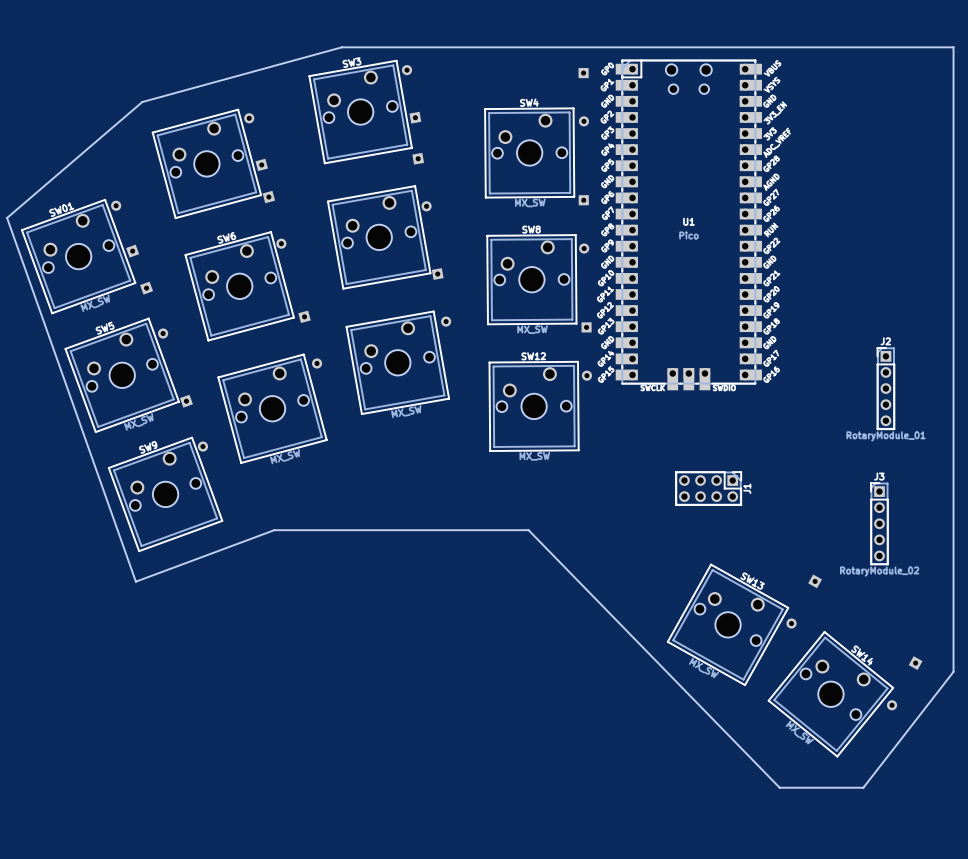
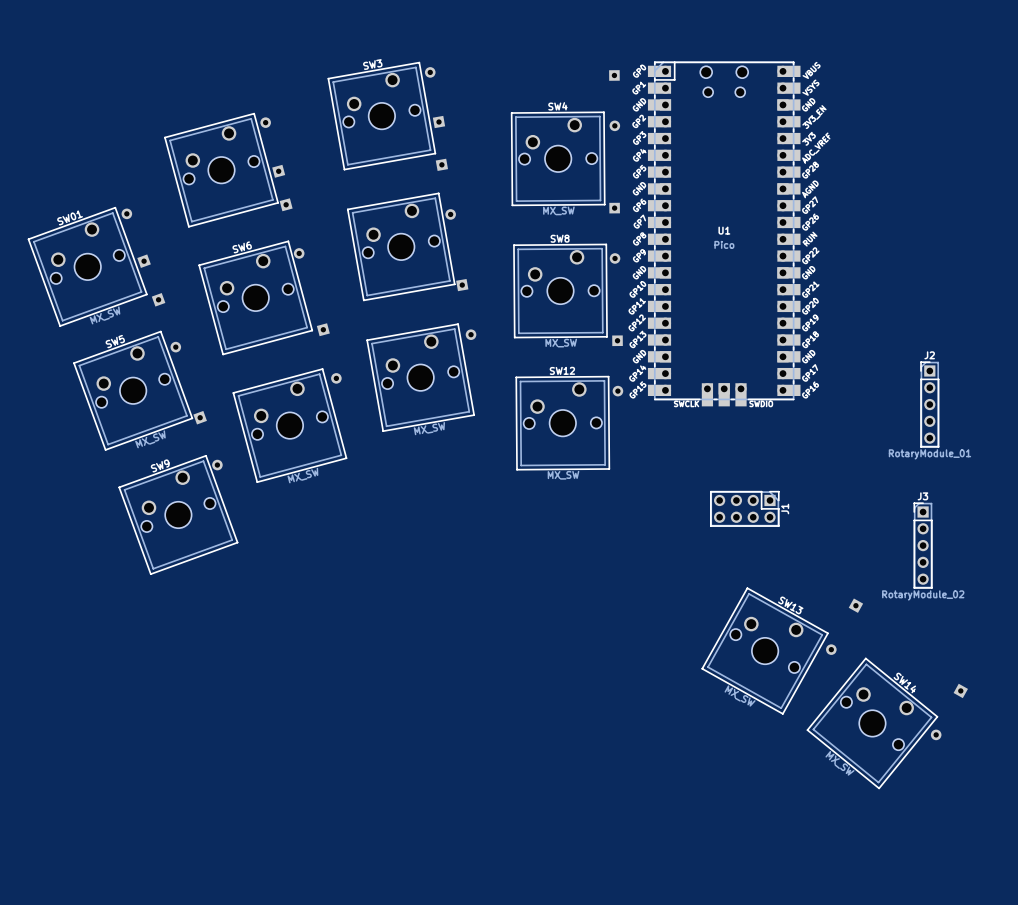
board edge: (341, 47) (953, 47) (953, 671) (863, 787) (779, 787) (528, 530) (274, 530) (135, 581) (7, 217) (142, 102) (341, 47) -> none

